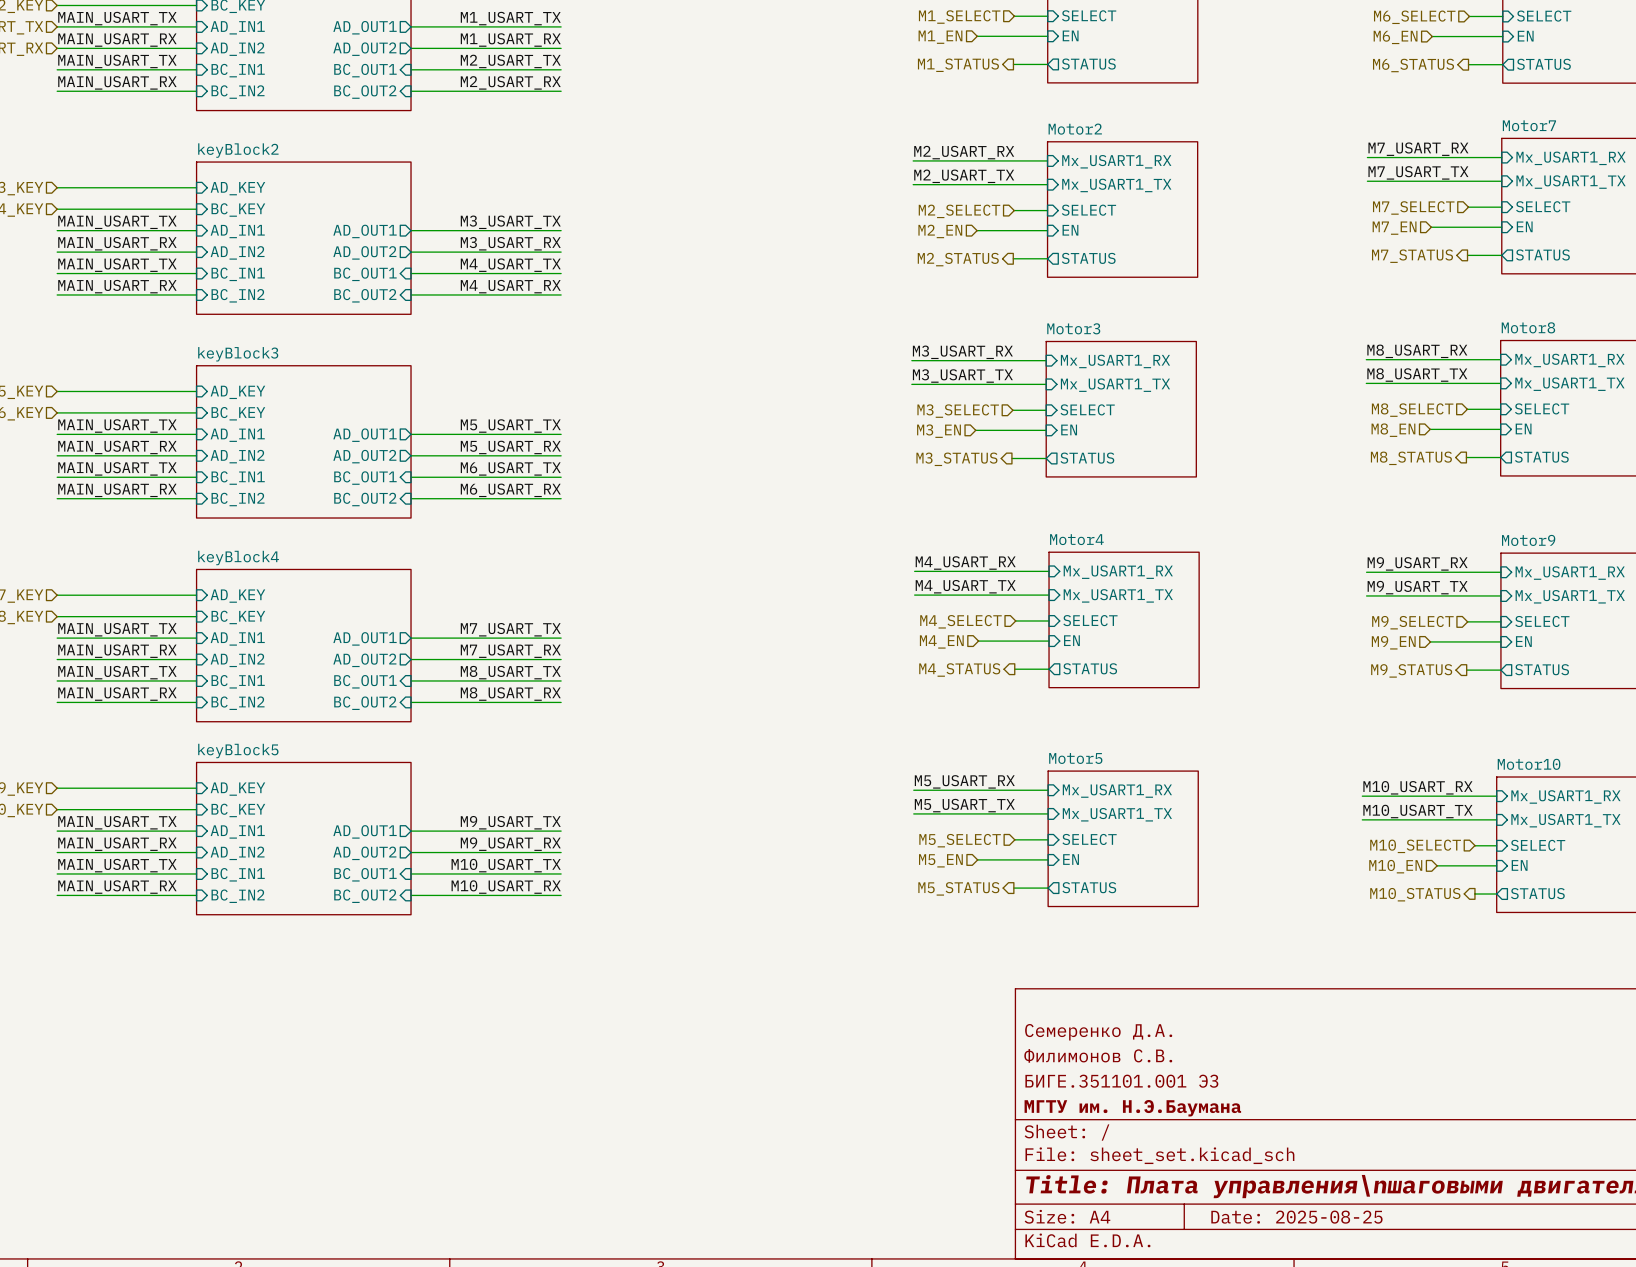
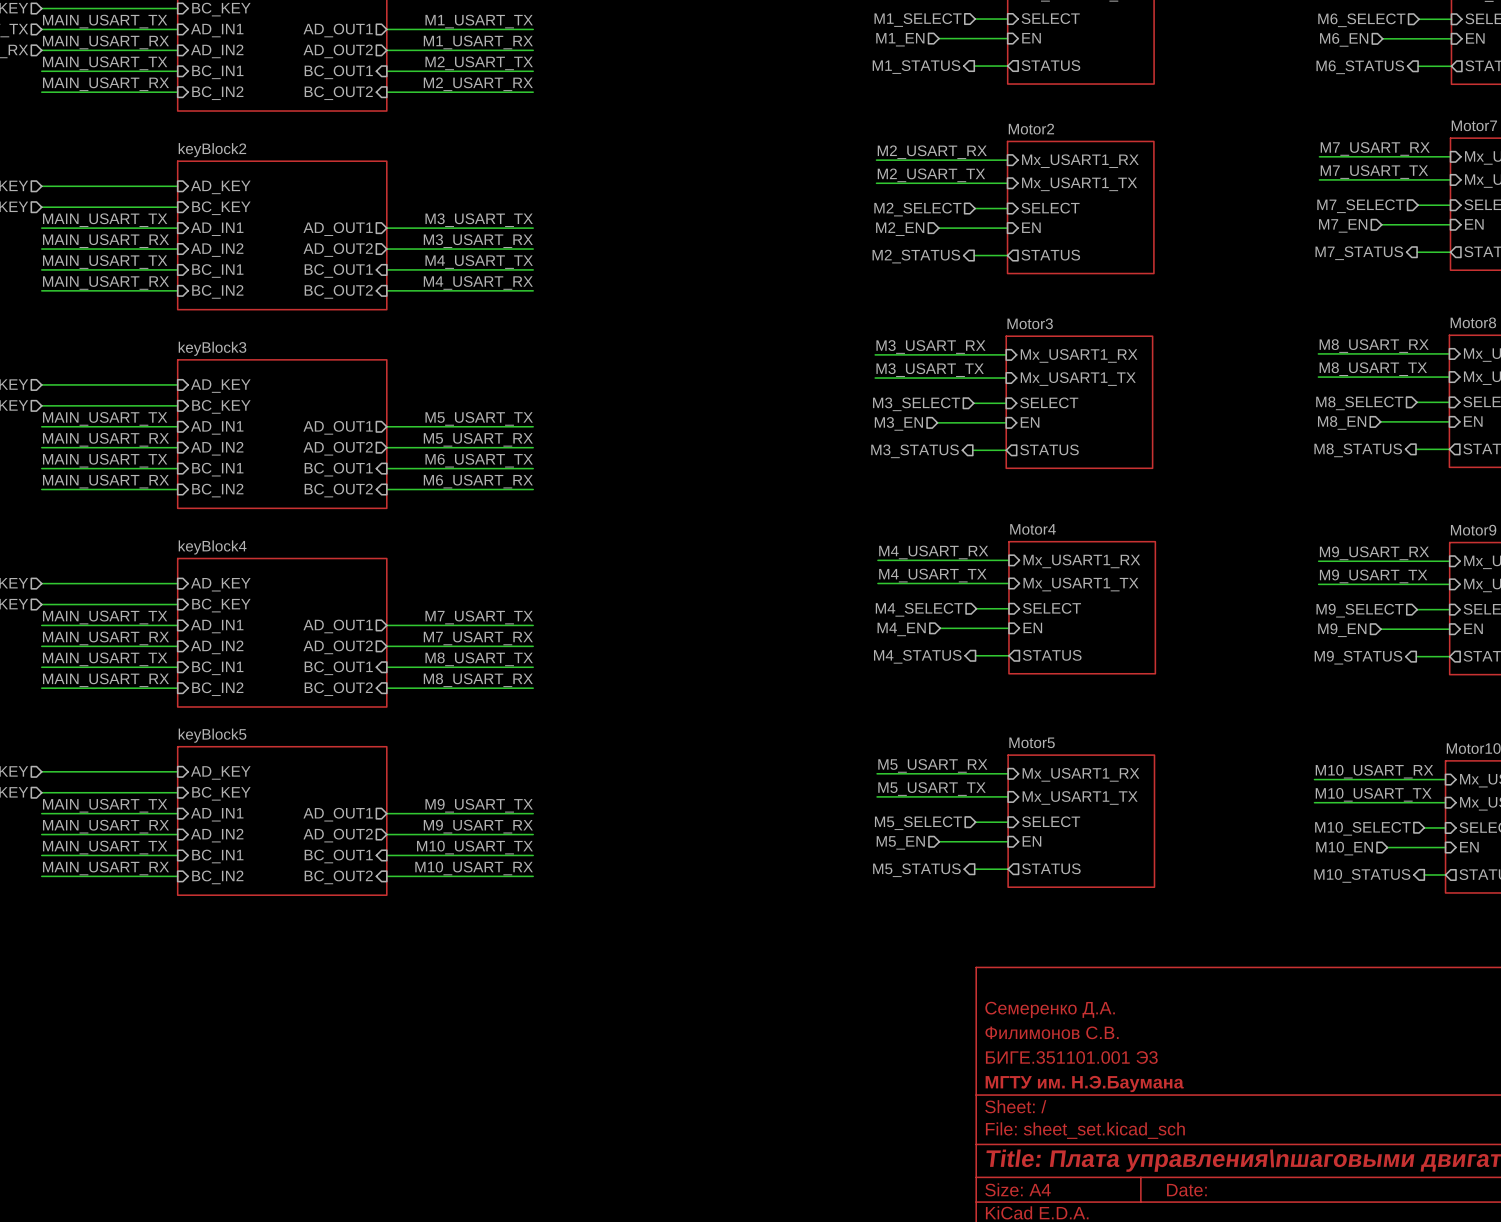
title block: Date: 2025-08-25 (1296, 1217) -> Date: (1186, 1190)

